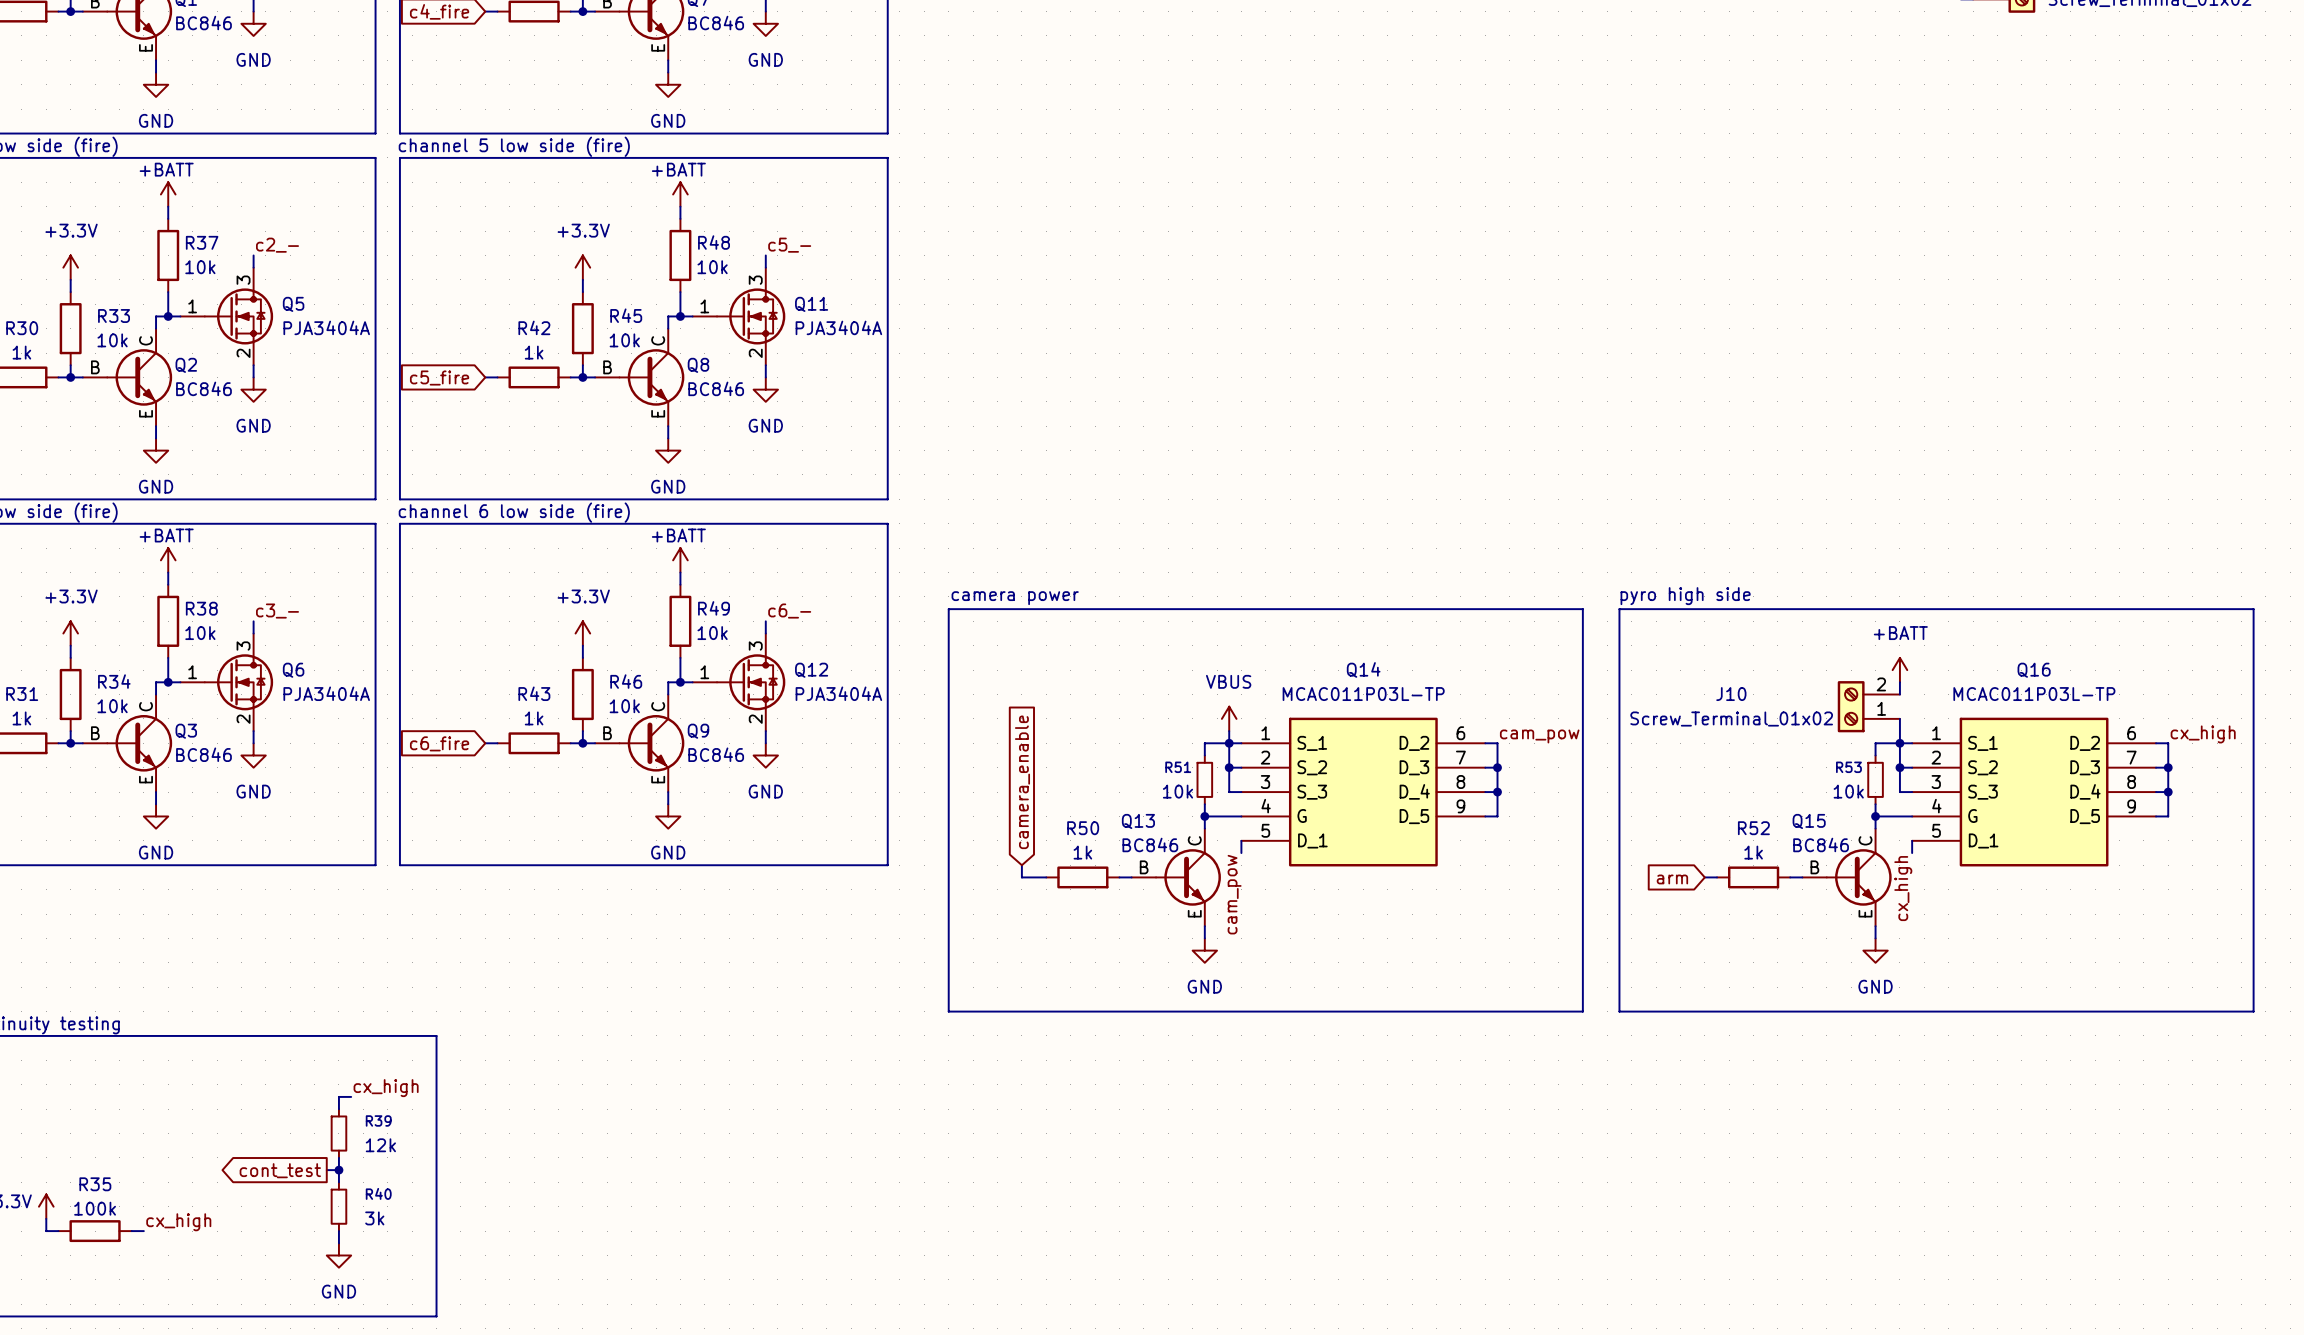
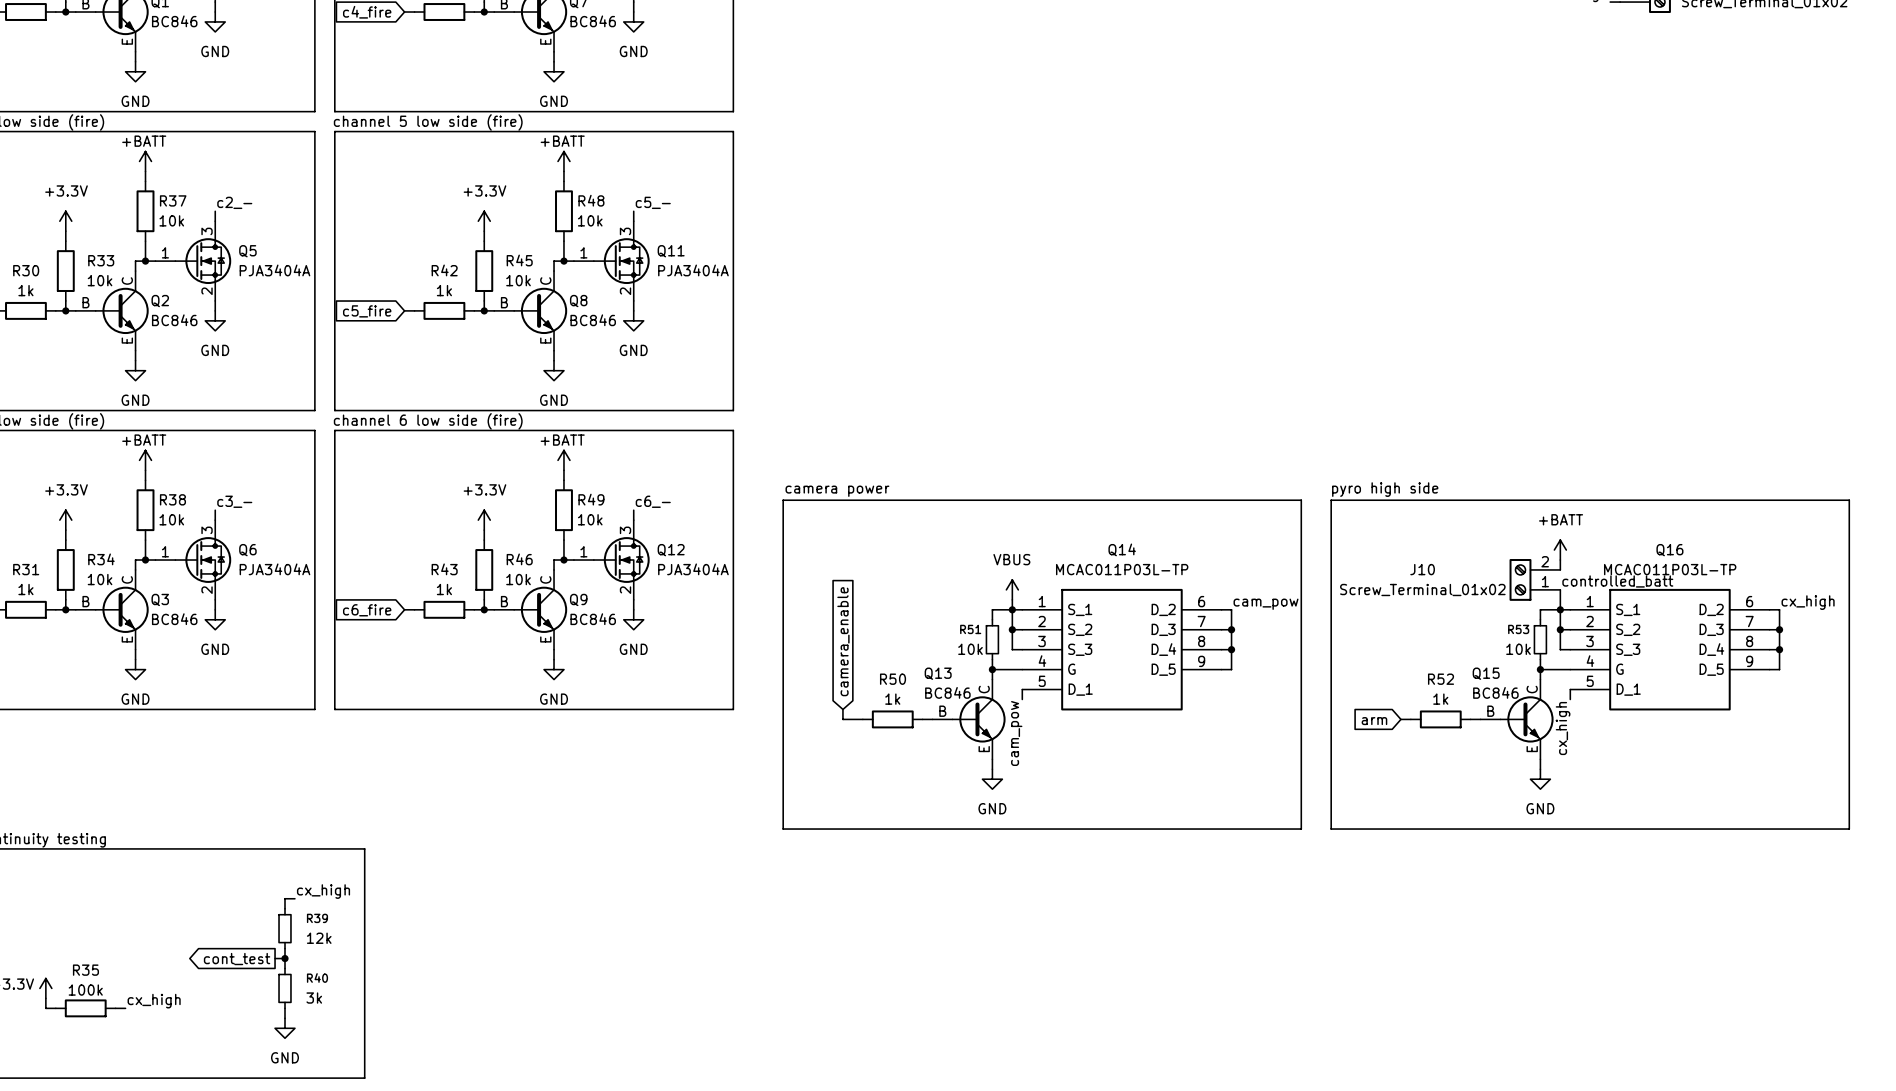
label: none -> controlled_batt (1617, 581)

